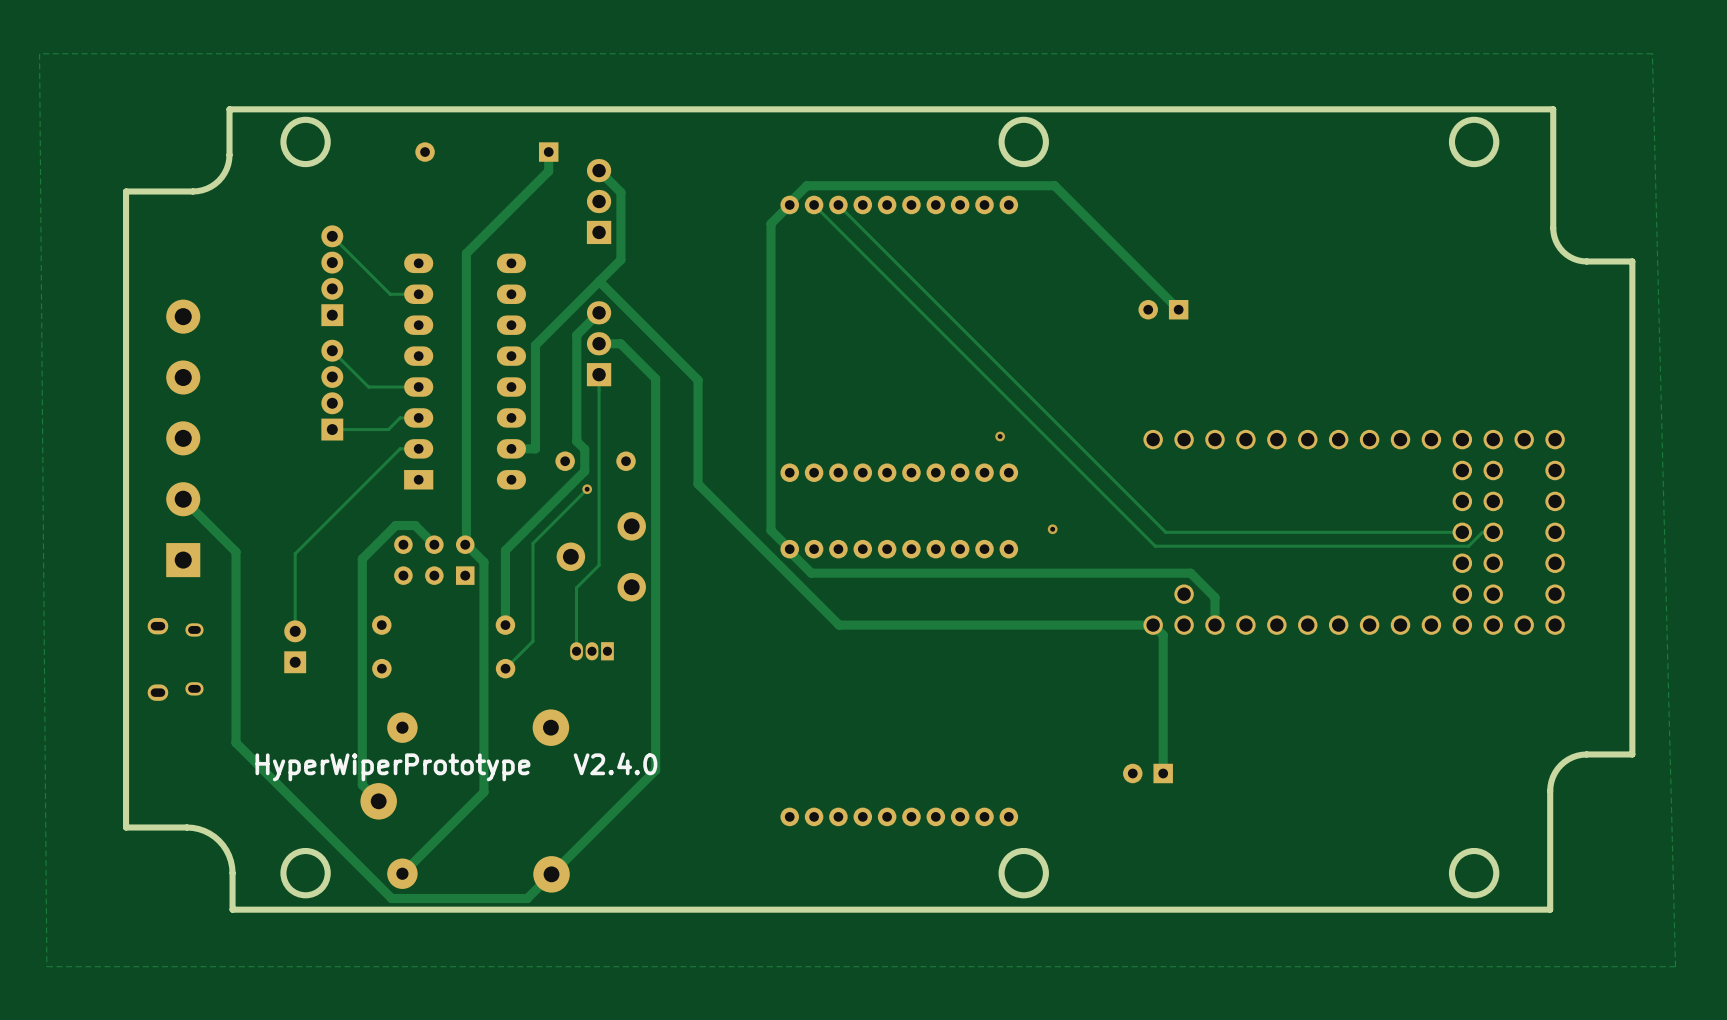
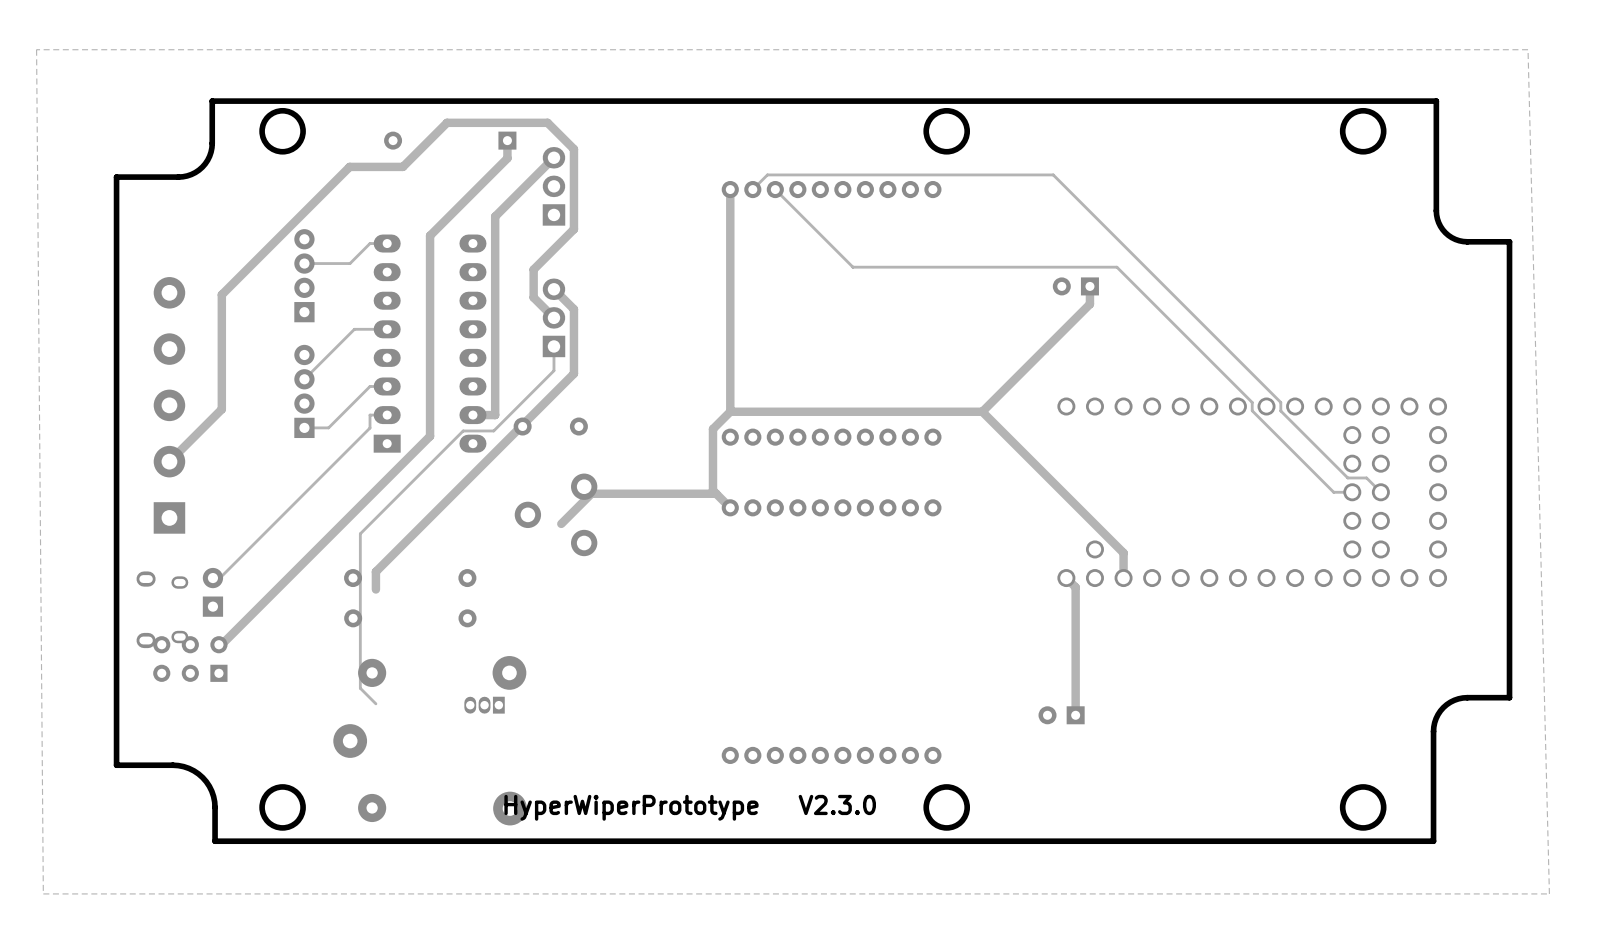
track: (599, 170) (620, 192) (620, 259) (535, 345) -> (553, 157) (495, 216) (495, 319)
track: none -> (730, 189) (730, 411)
track: (814, 204) (1155, 546) (1468, 546) (1482, 532) (1493, 532) -> (752, 189) (767, 174) (1053, 174) (1280, 402) (1280, 410) (1347, 477) (1366, 477) (1380, 492)
track: (332, 236) (390, 294) (418, 294) -> none
track: (466, 253) (466, 544) -> (431, 234) (430, 436) (221, 644) (218, 644)
track: none -> (387, 243) (370, 243) (350, 263) (304, 263)
part position: (332, 275) -> (304, 275)
track: (599, 281) (698, 380) (698, 483) (839, 625) (1153, 625) -> none
track: (922, 288) (1165, 532) (1442, 532) -> (852, 267) (1116, 267) (1252, 402) (1252, 410) (1333, 492)
track: (1178, 309) (1054, 185) (806, 185) (771, 223) (771, 463) -> (1089, 286) (1089, 304) (982, 411)
track: (599, 312) (576, 335) (576, 441) (584, 449) (584, 471) (505, 550) (505, 625) -> (553, 289) (573, 309) (573, 373) (375, 571) (375, 589)
track: (599, 343) (620, 343) (655, 378) (655, 770) (527, 898) (391, 898) (236, 742) (236, 551) (183, 499) -> (553, 317) (533, 297) (533, 269) (573, 229) (573, 149) (547, 122) (447, 122) (402, 166) (349, 166) (221, 294) (221, 409) (169, 461)
track: (332, 350) (368, 387) (418, 387) -> none
track: none -> (387, 329) (354, 329) (304, 379)
part position: (332, 390) -> (304, 391)
track: (599, 400) (599, 565) (576, 587) (576, 651) -> (553, 370) (493, 430) (463, 430) (360, 533) (360, 688) (375, 703)
track: (388, 429) (332, 429) -> (359, 397) (328, 427) (304, 427)
via: (1000, 436) -> none
track: none -> (730, 411) (712, 429)
track: none -> (982, 411) (730, 411)
track: (400, 448) (295, 553) (295, 631) -> (370, 415) (370, 428) (219, 578) (212, 578)
track: (587, 489) (533, 543) (533, 641) (505, 668) -> none
via: (587, 489) -> none
via: (1052, 529) -> none
track: none -> (716, 493) (591, 493) (561, 523)
track: (434, 544) (415, 525) (395, 525) (362, 559) (362, 784) (378, 801) -> none
track: (466, 544) (483, 562) (483, 792) (402, 873) -> none
track: (789, 549) (789, 551) (811, 573) (1190, 573) (1215, 597) -> (982, 411) (1123, 552)
part position: (434, 560) -> (190, 659)
part position: (295, 646) -> (212, 592)
part position: (592, 651) -> (484, 705)
text: HyperWiperPrototype V2.4.0 (456, 766) -> none
text: none -> HyperWiperPrototype V2.3.0 (690, 807)

